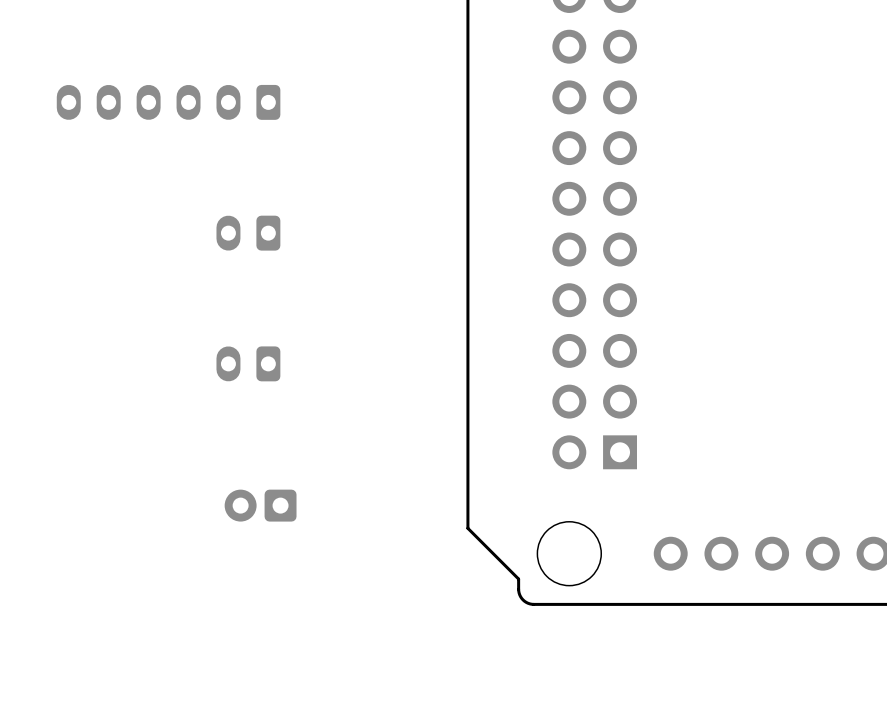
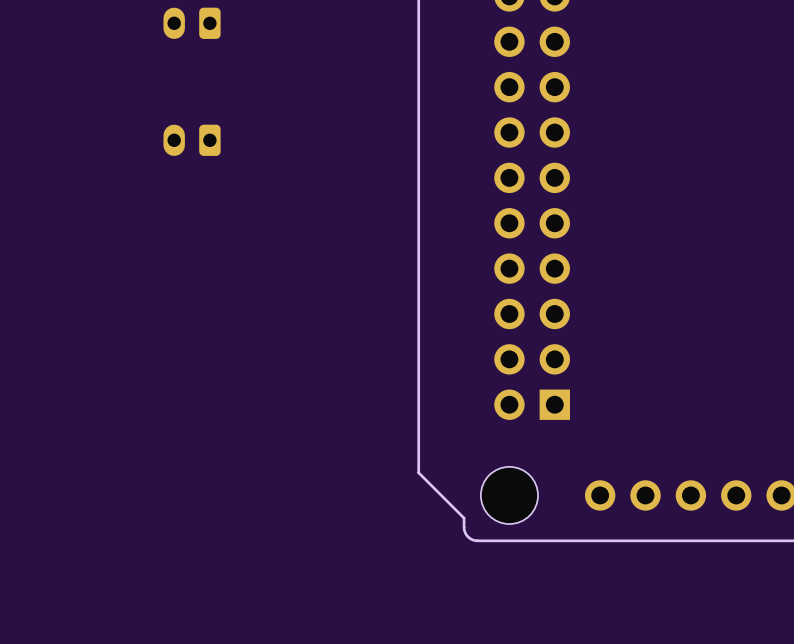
part: none -> (192, 23)
part: (168, 102) -> none
part position: (248, 233) -> (192, 140)
part: (248, 363) -> none
part: (260, 505) -> none

